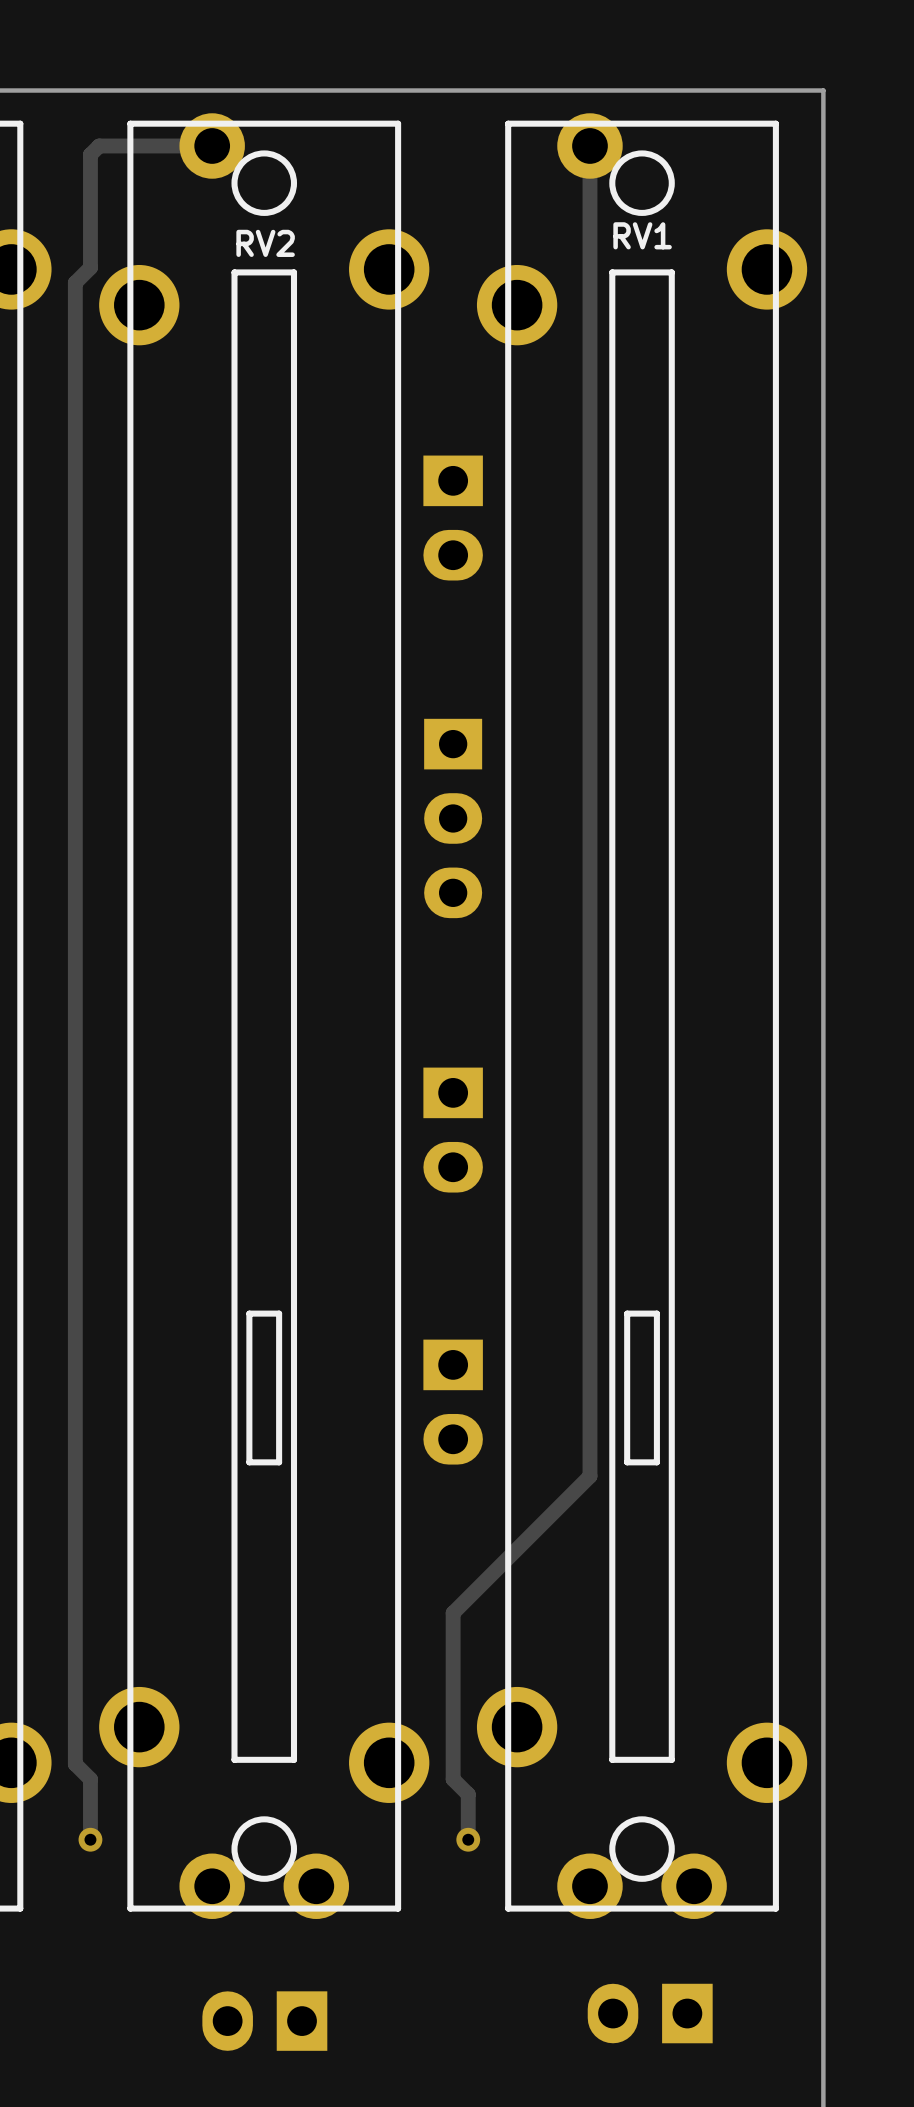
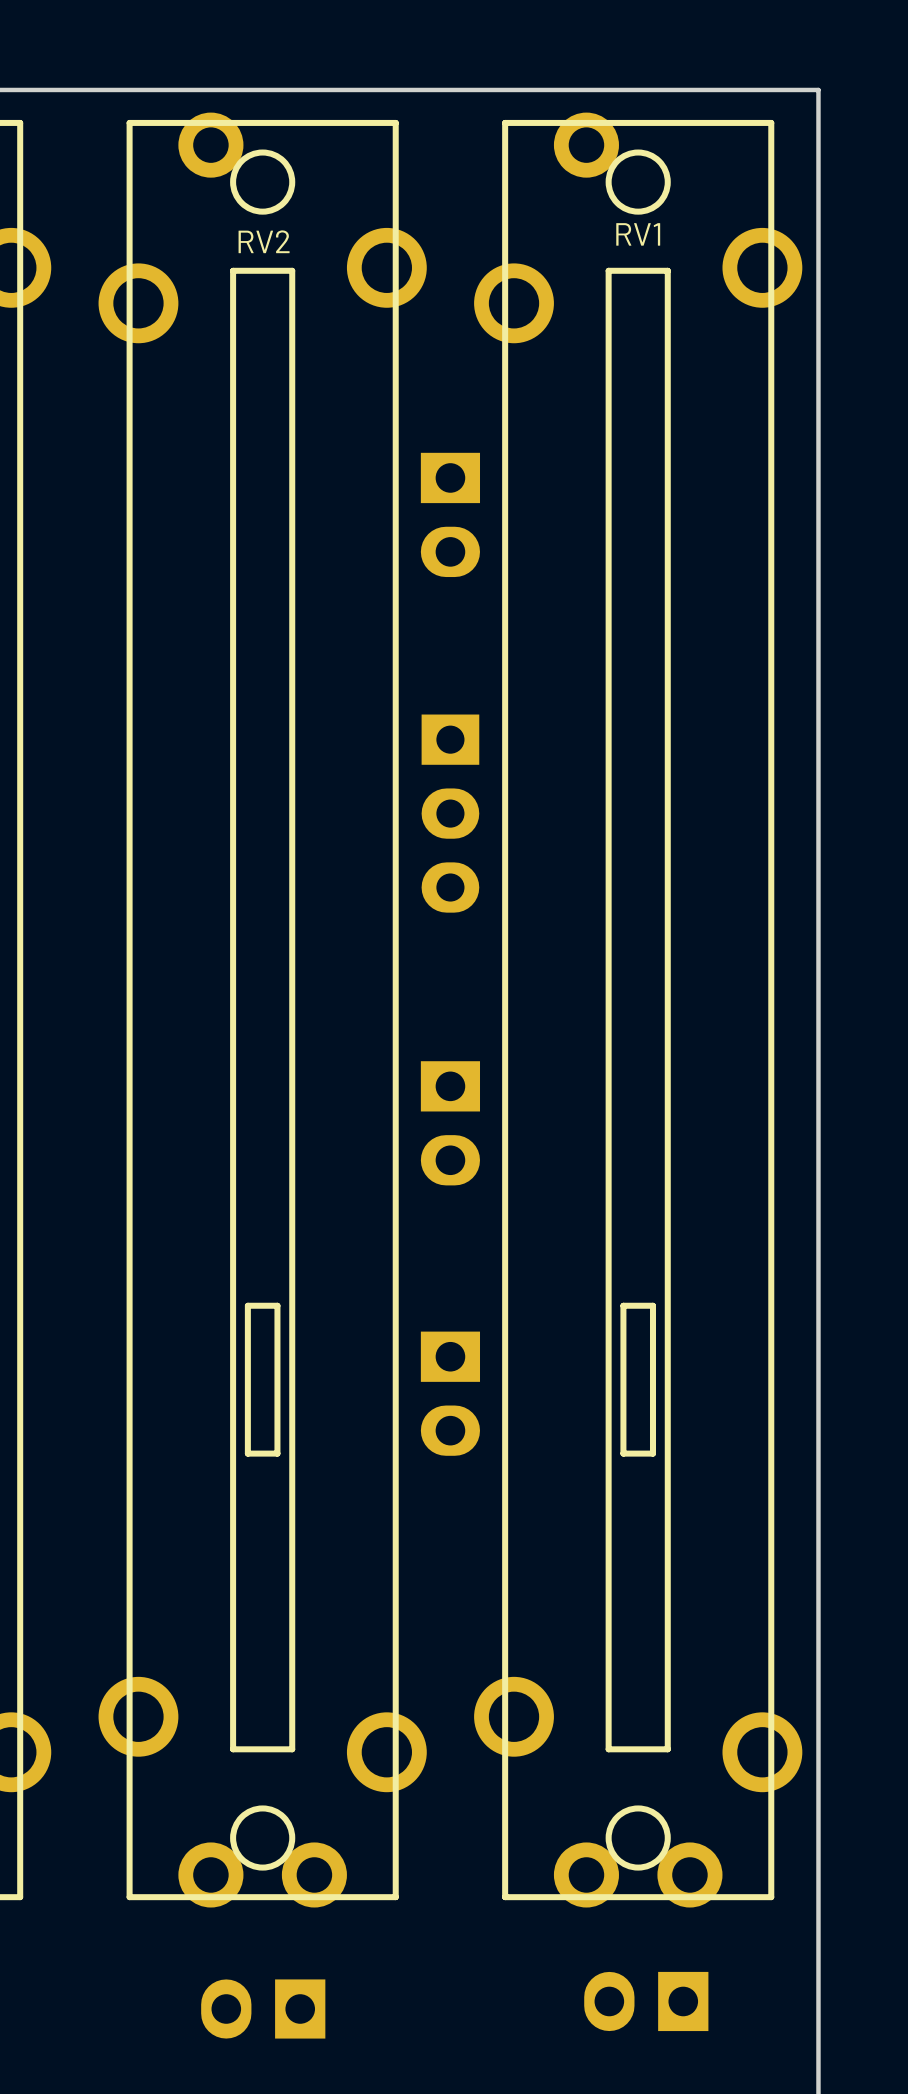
track: (212, 145) (99, 145) (90, 154) (90, 267) (75, 282) (75, 1764) (90, 1779) (90, 1839) -> none
track: (589, 145) (589, 1476) (453, 1613) (453, 1779) (468, 1794) (468, 1839) -> none
via: (90, 1839) -> none
via: (468, 1839) -> none

